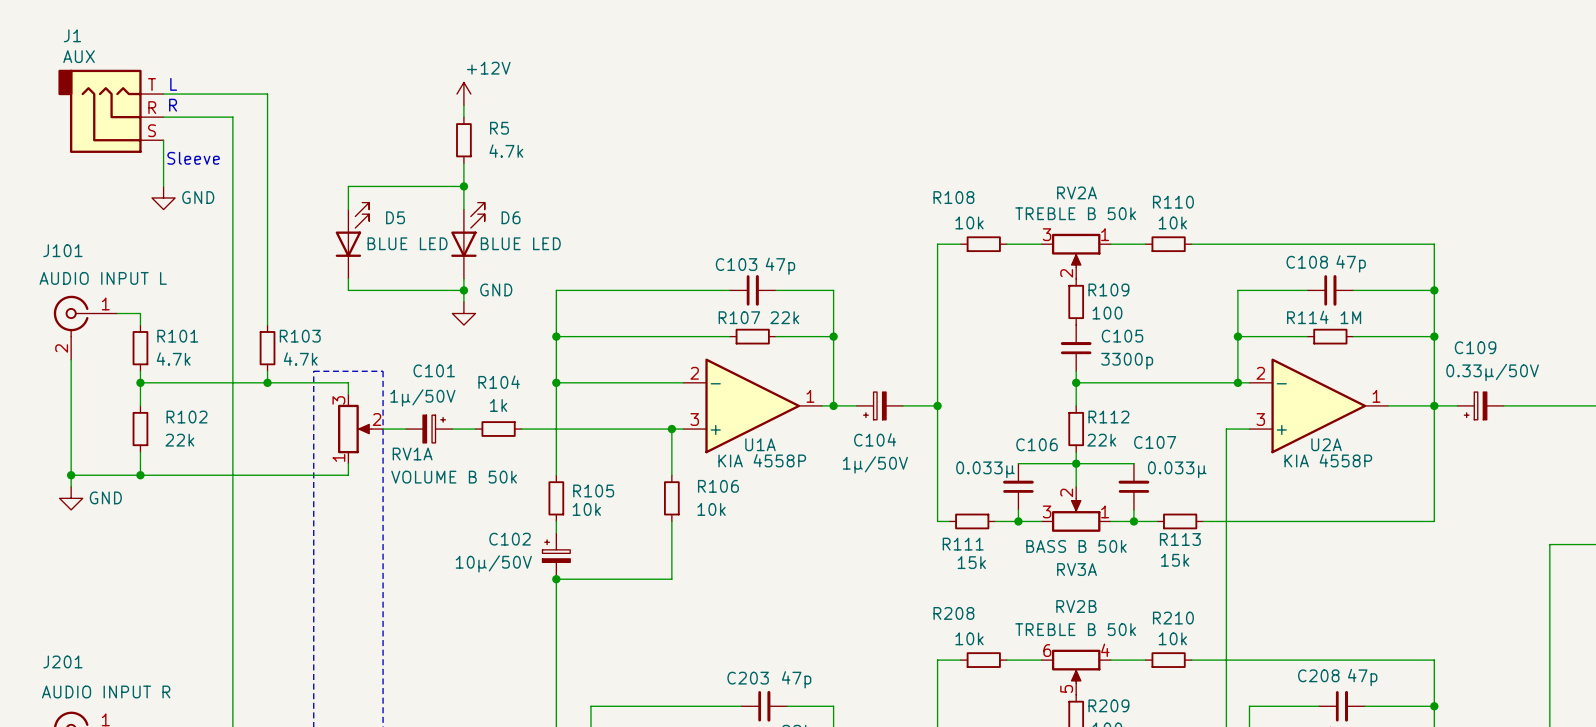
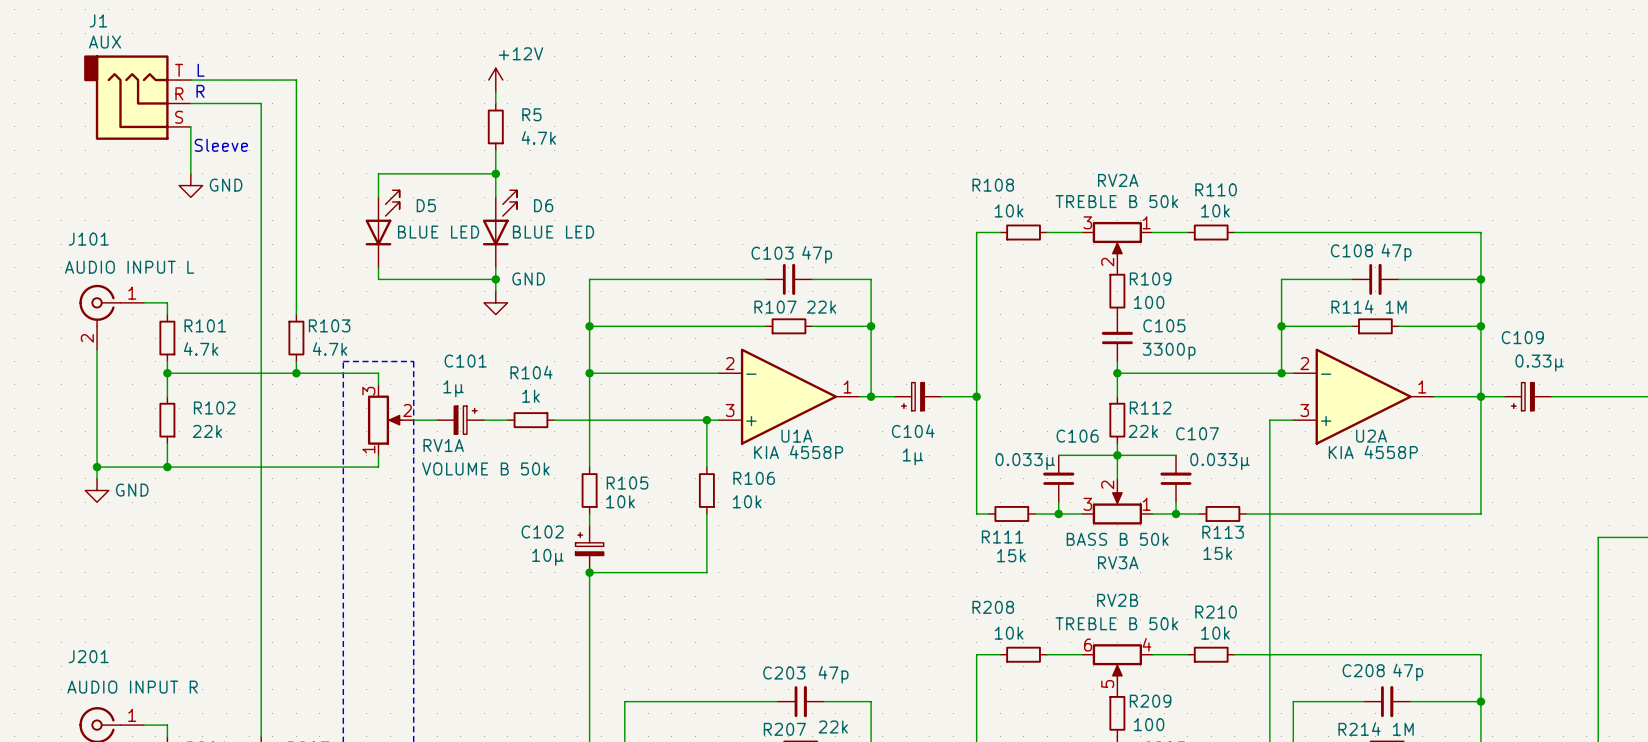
C109 value: 0.33μ/50V (1492, 372) -> 0.33μ (1539, 363)
C101 value: 1μ/50V (422, 397) -> 1μ (453, 388)
C104 value: 1μ/50V (875, 464) -> 1μ (912, 456)
C102 value: 10μ/50V (493, 563) -> 10μ (547, 557)

